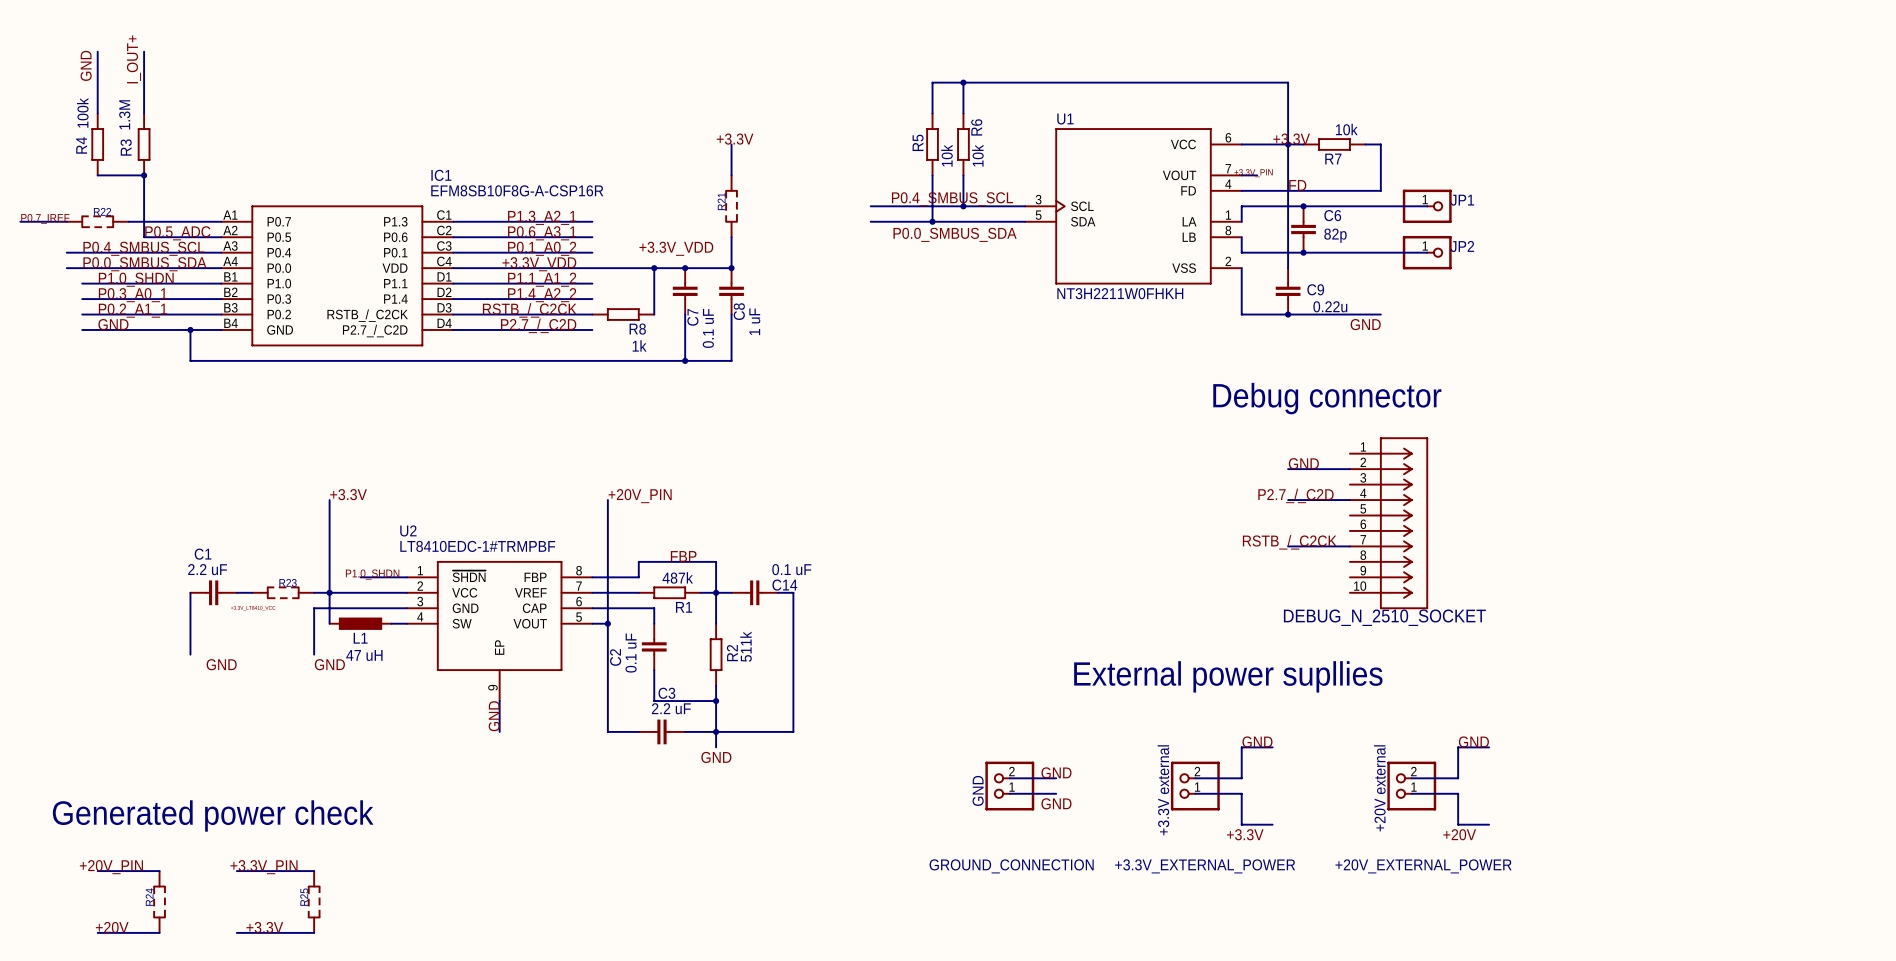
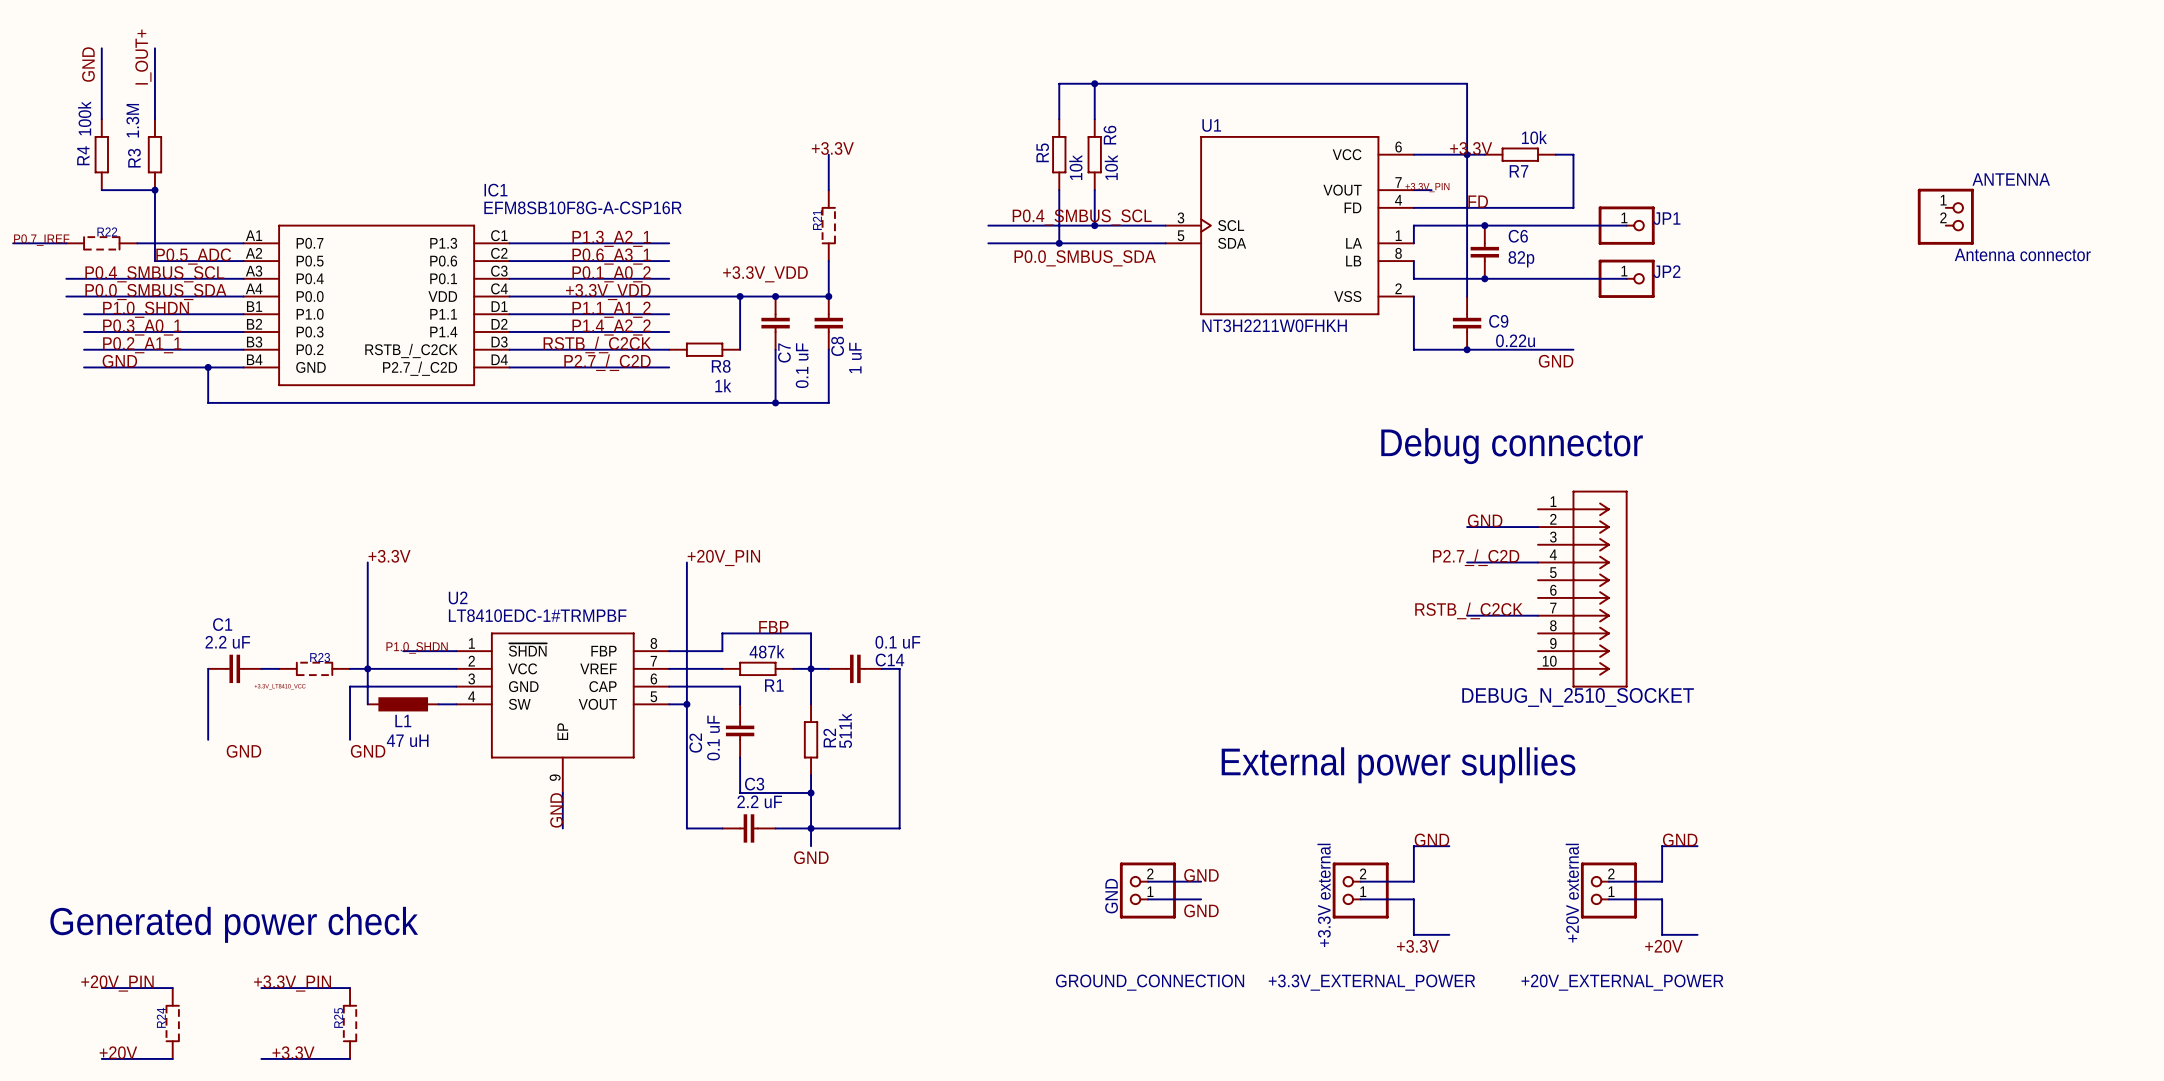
ANTENNA: none -> Antenna connector (1945, 216)

